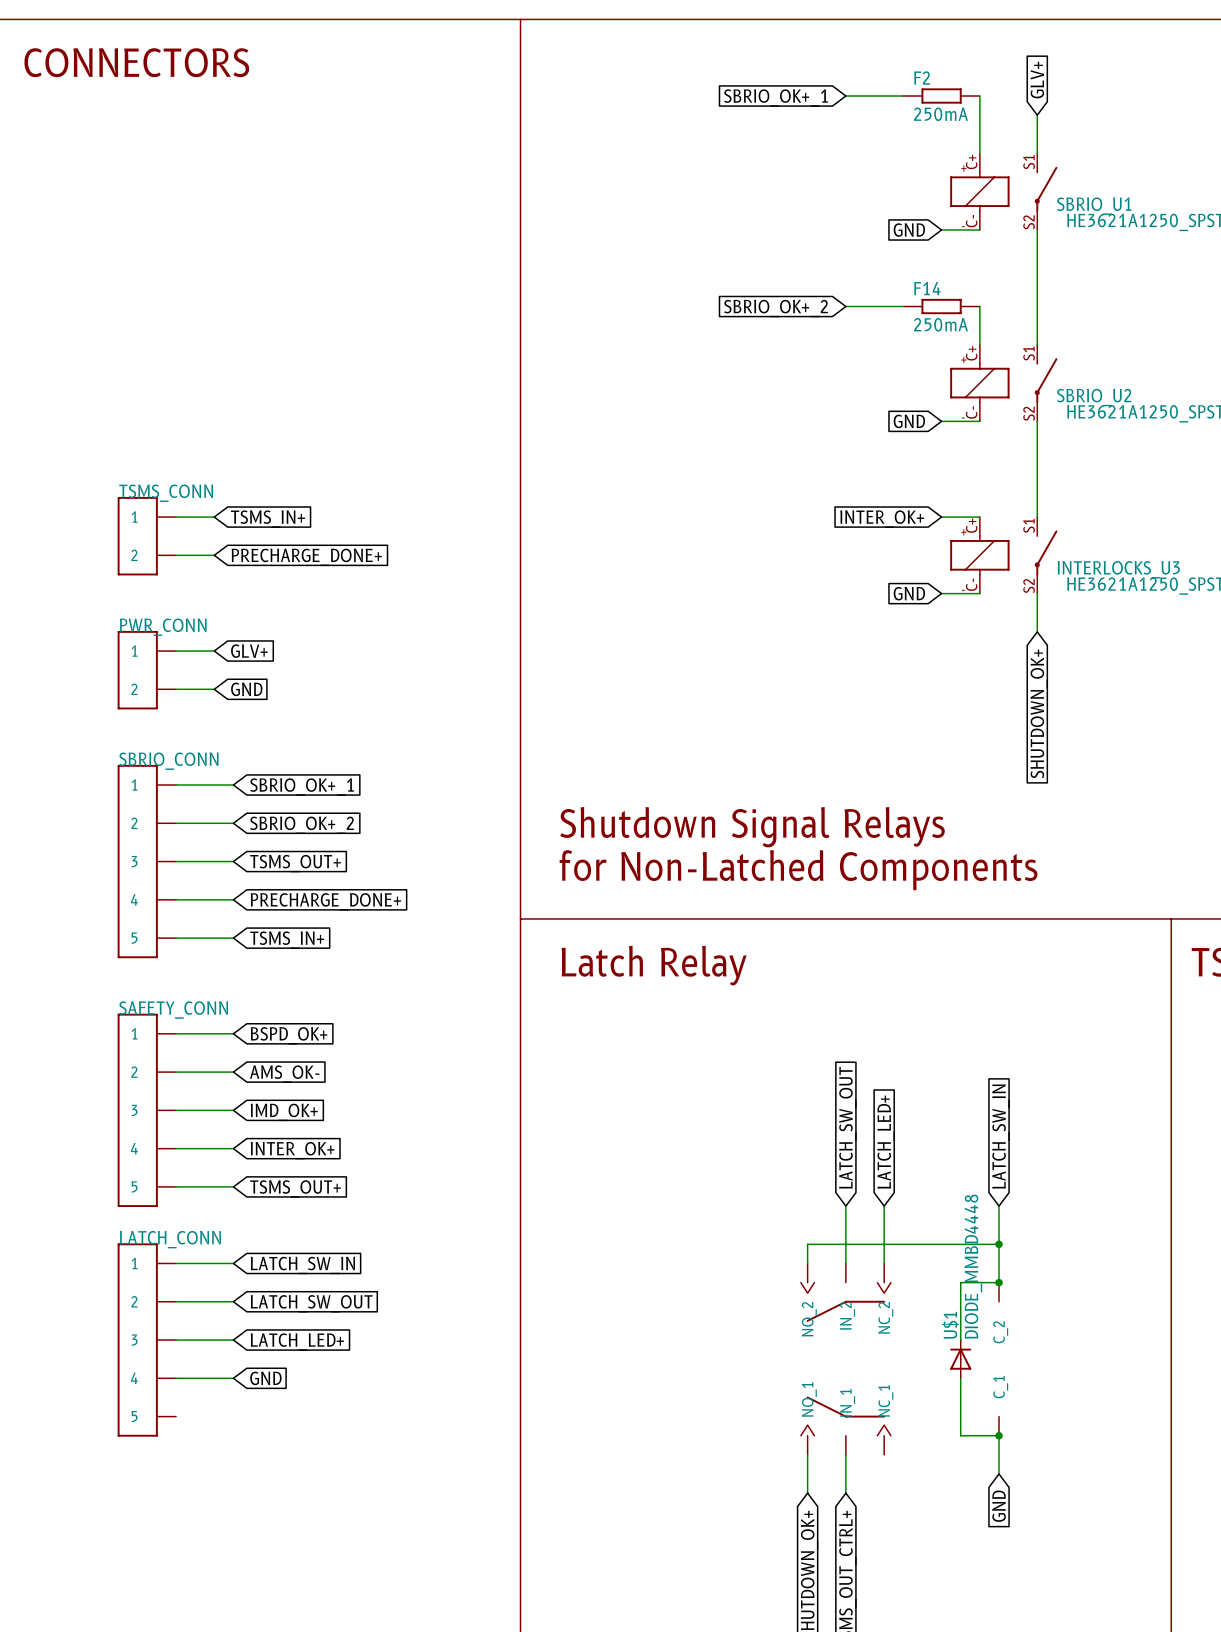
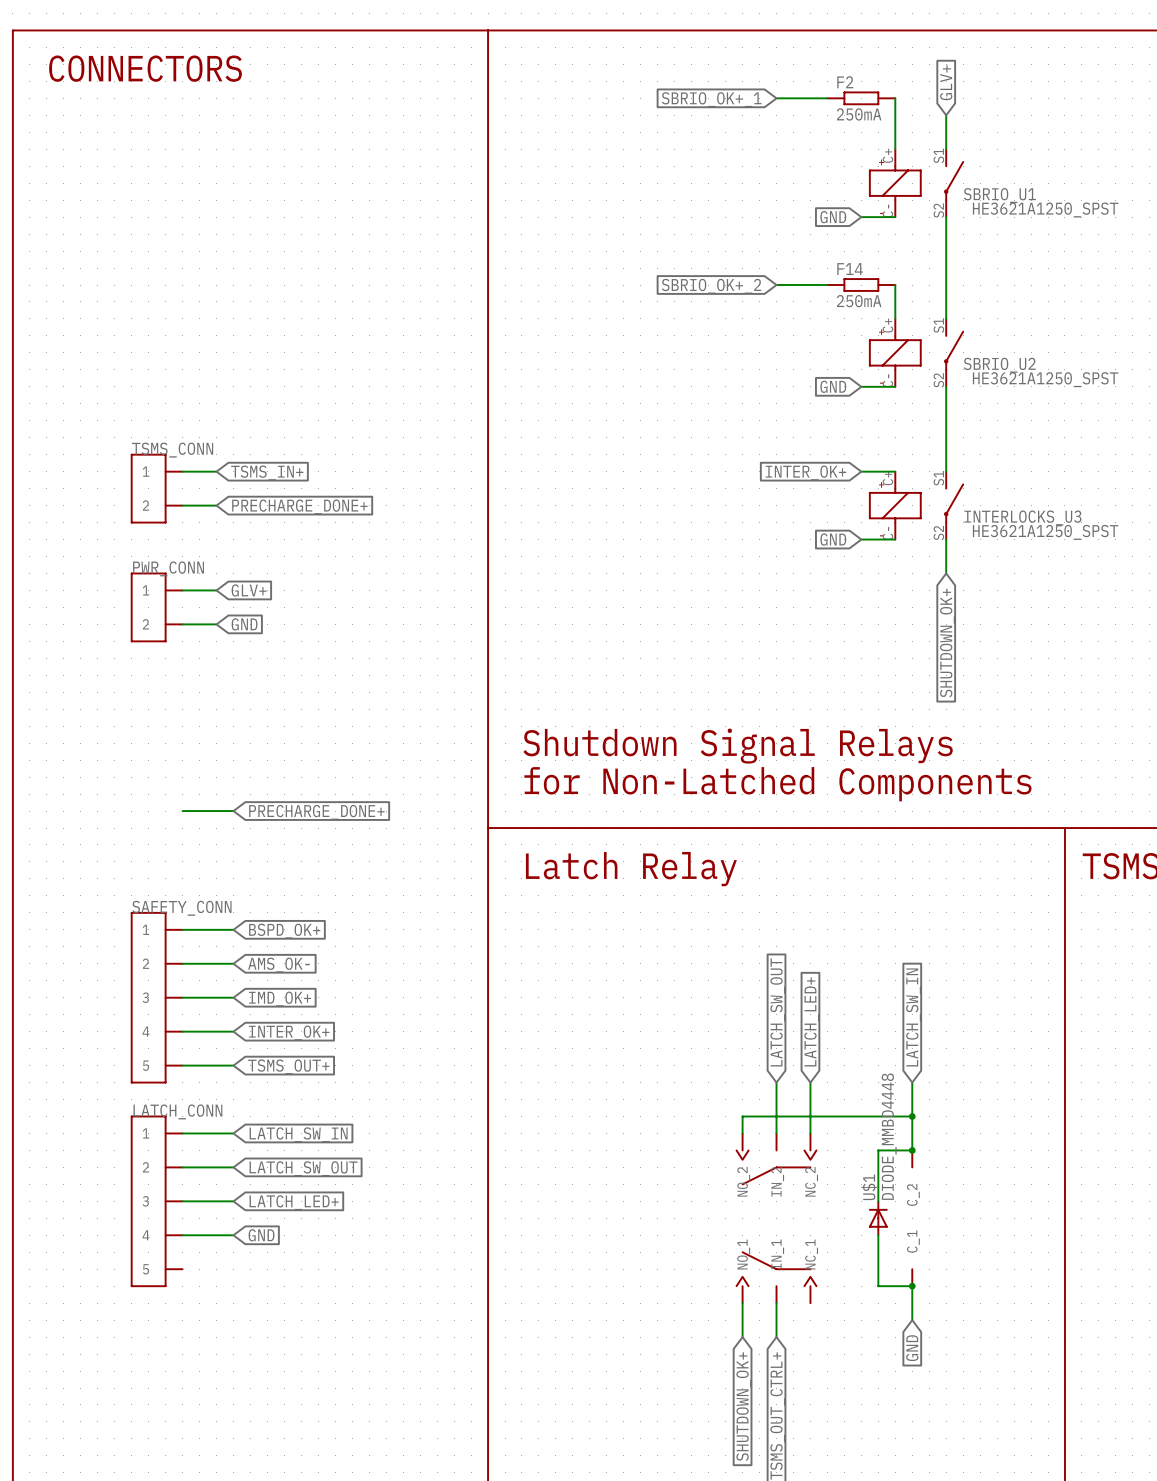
wire: (176, 785) (233, 785) -> none
global label: SBRIO_OK+_1 (302, 787) -> none
wire: (176, 823) (233, 823) -> none
global label: SBRIO_OK+_2 (302, 825) -> none
SBRIO_CONN: (146, 861) -> none
wire: (176, 861) (233, 861) -> none
global label: TSMS_OUT+ (295, 863) -> none
wire: (176, 938) (233, 938) -> none
global label: TSMS_IN+ (287, 940) -> none

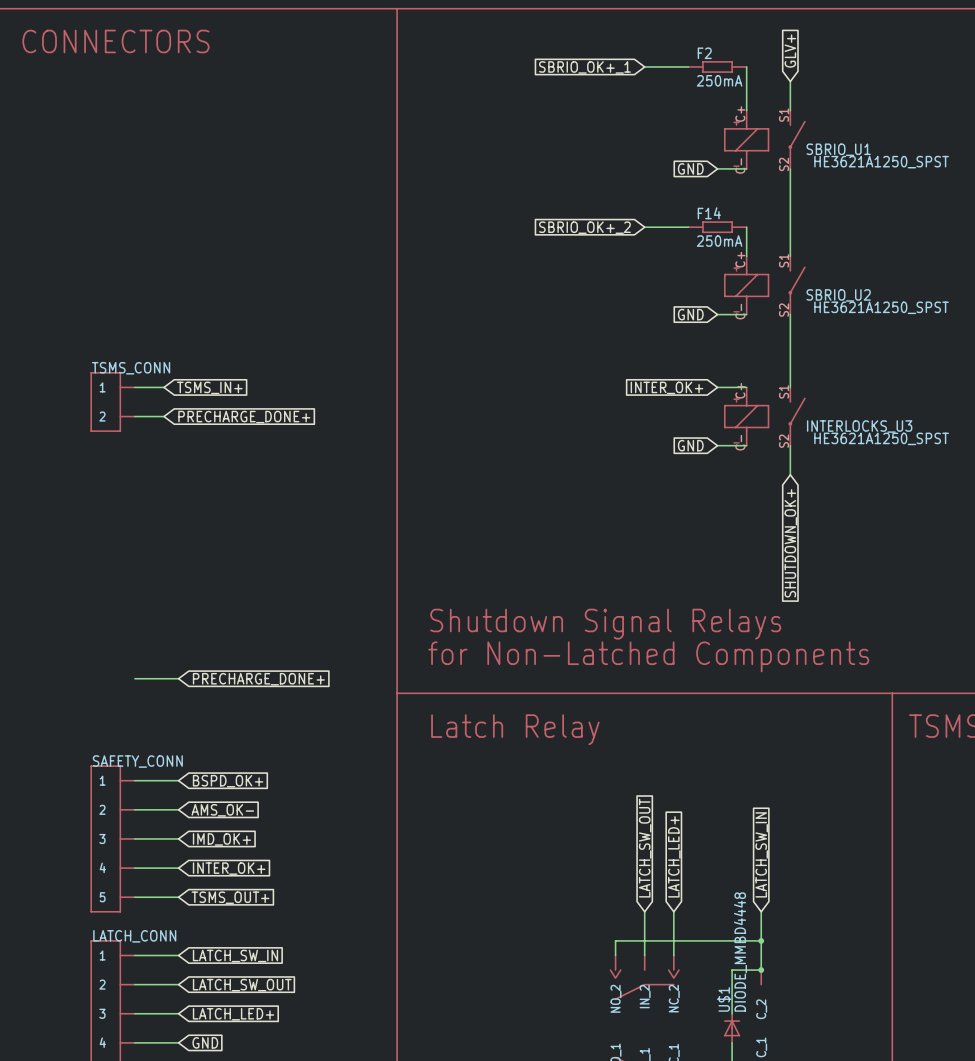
wire: (182, 590) (216, 590) -> none
global label: GLV+ (249, 590) -> none
PWR_CONN: (156, 607) -> none
wire: (182, 624) (216, 624) -> none
global label: GND (244, 624) -> none

